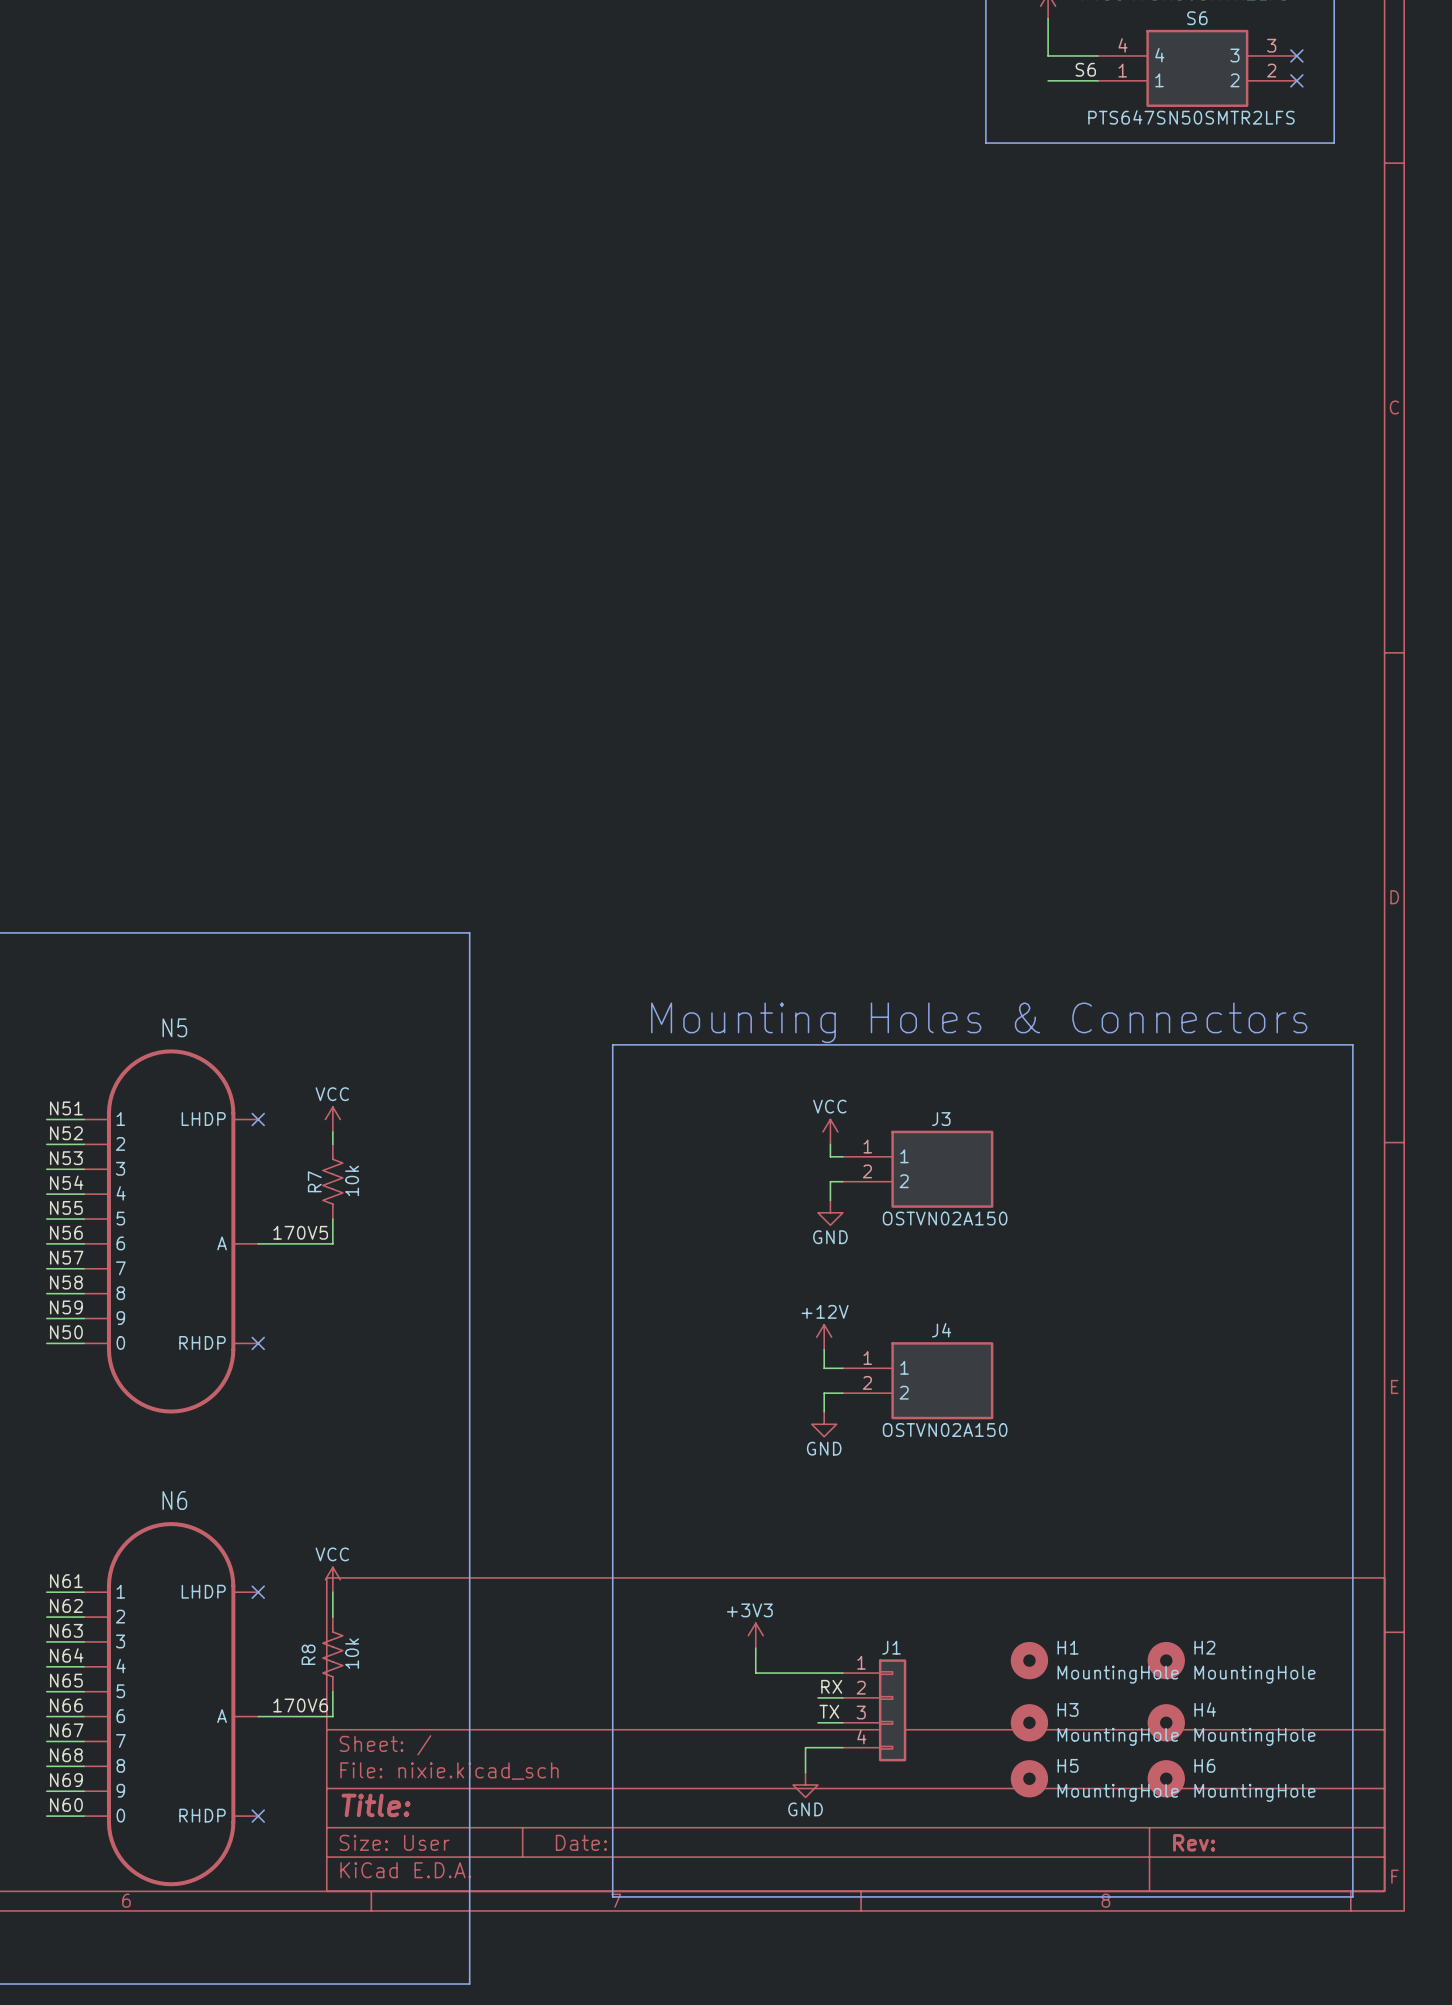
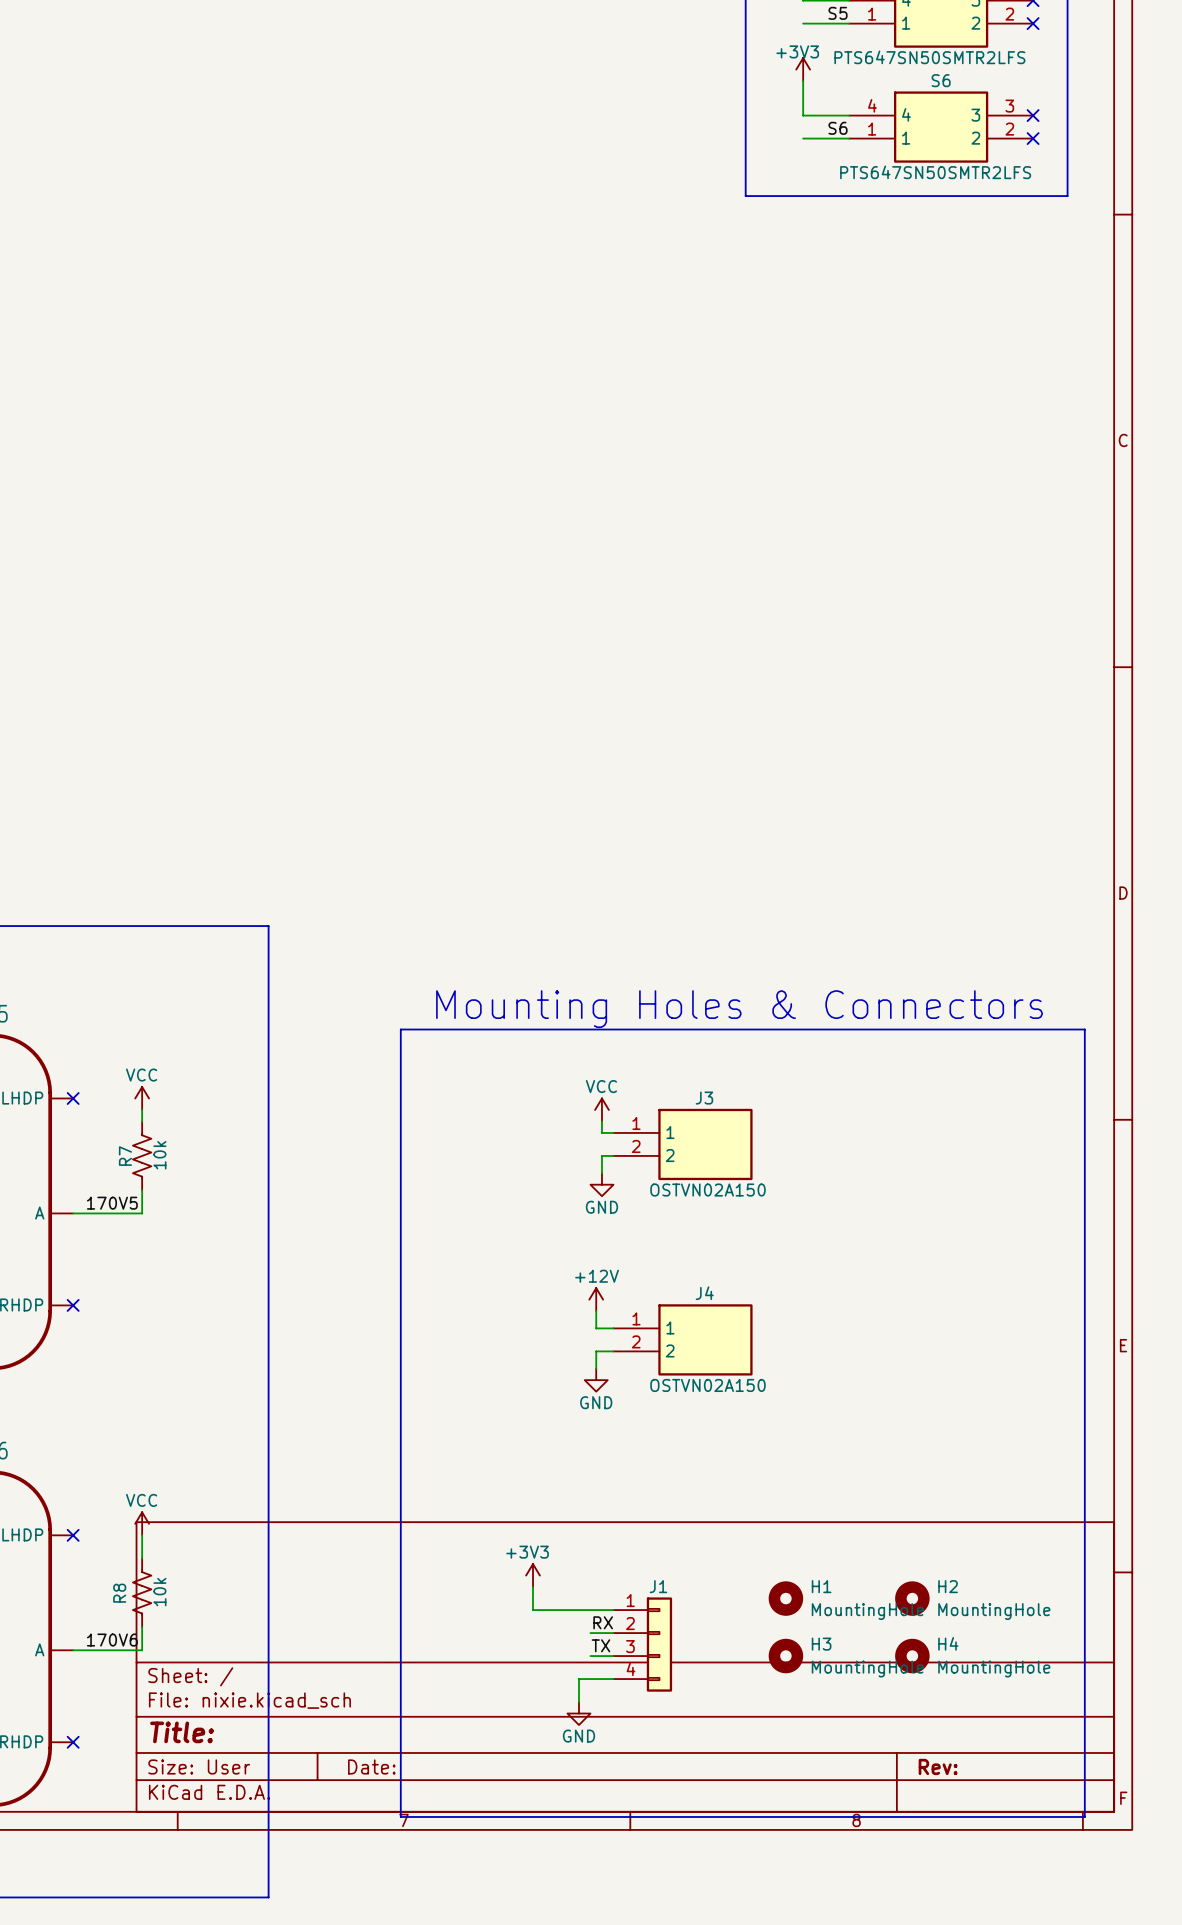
H5: MountingHole (1029, 1778) -> none
H6: MountingHole (1166, 1778) -> none

